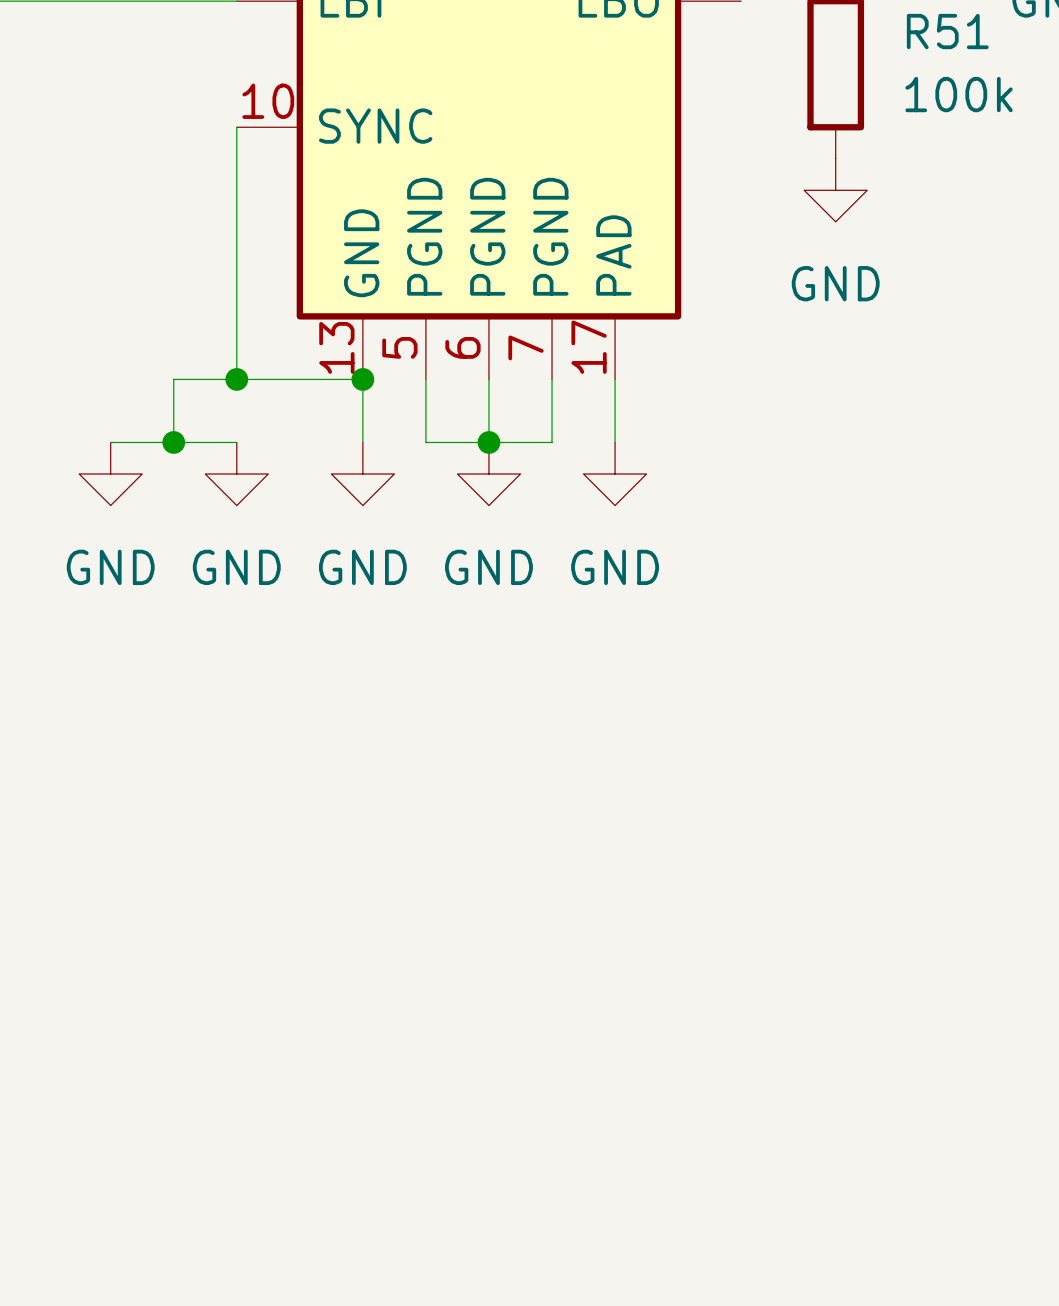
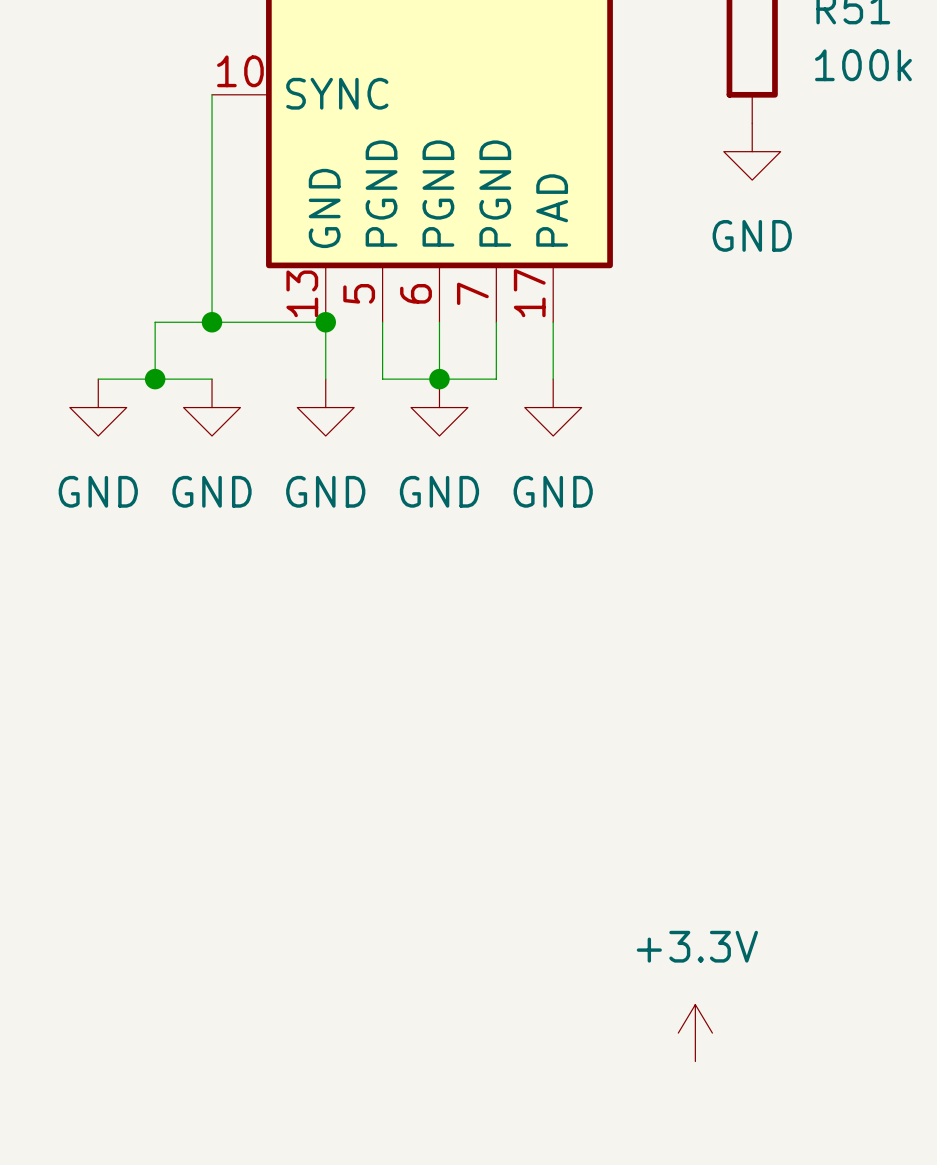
power symbol: none -> +3.3V (695, 1033)

